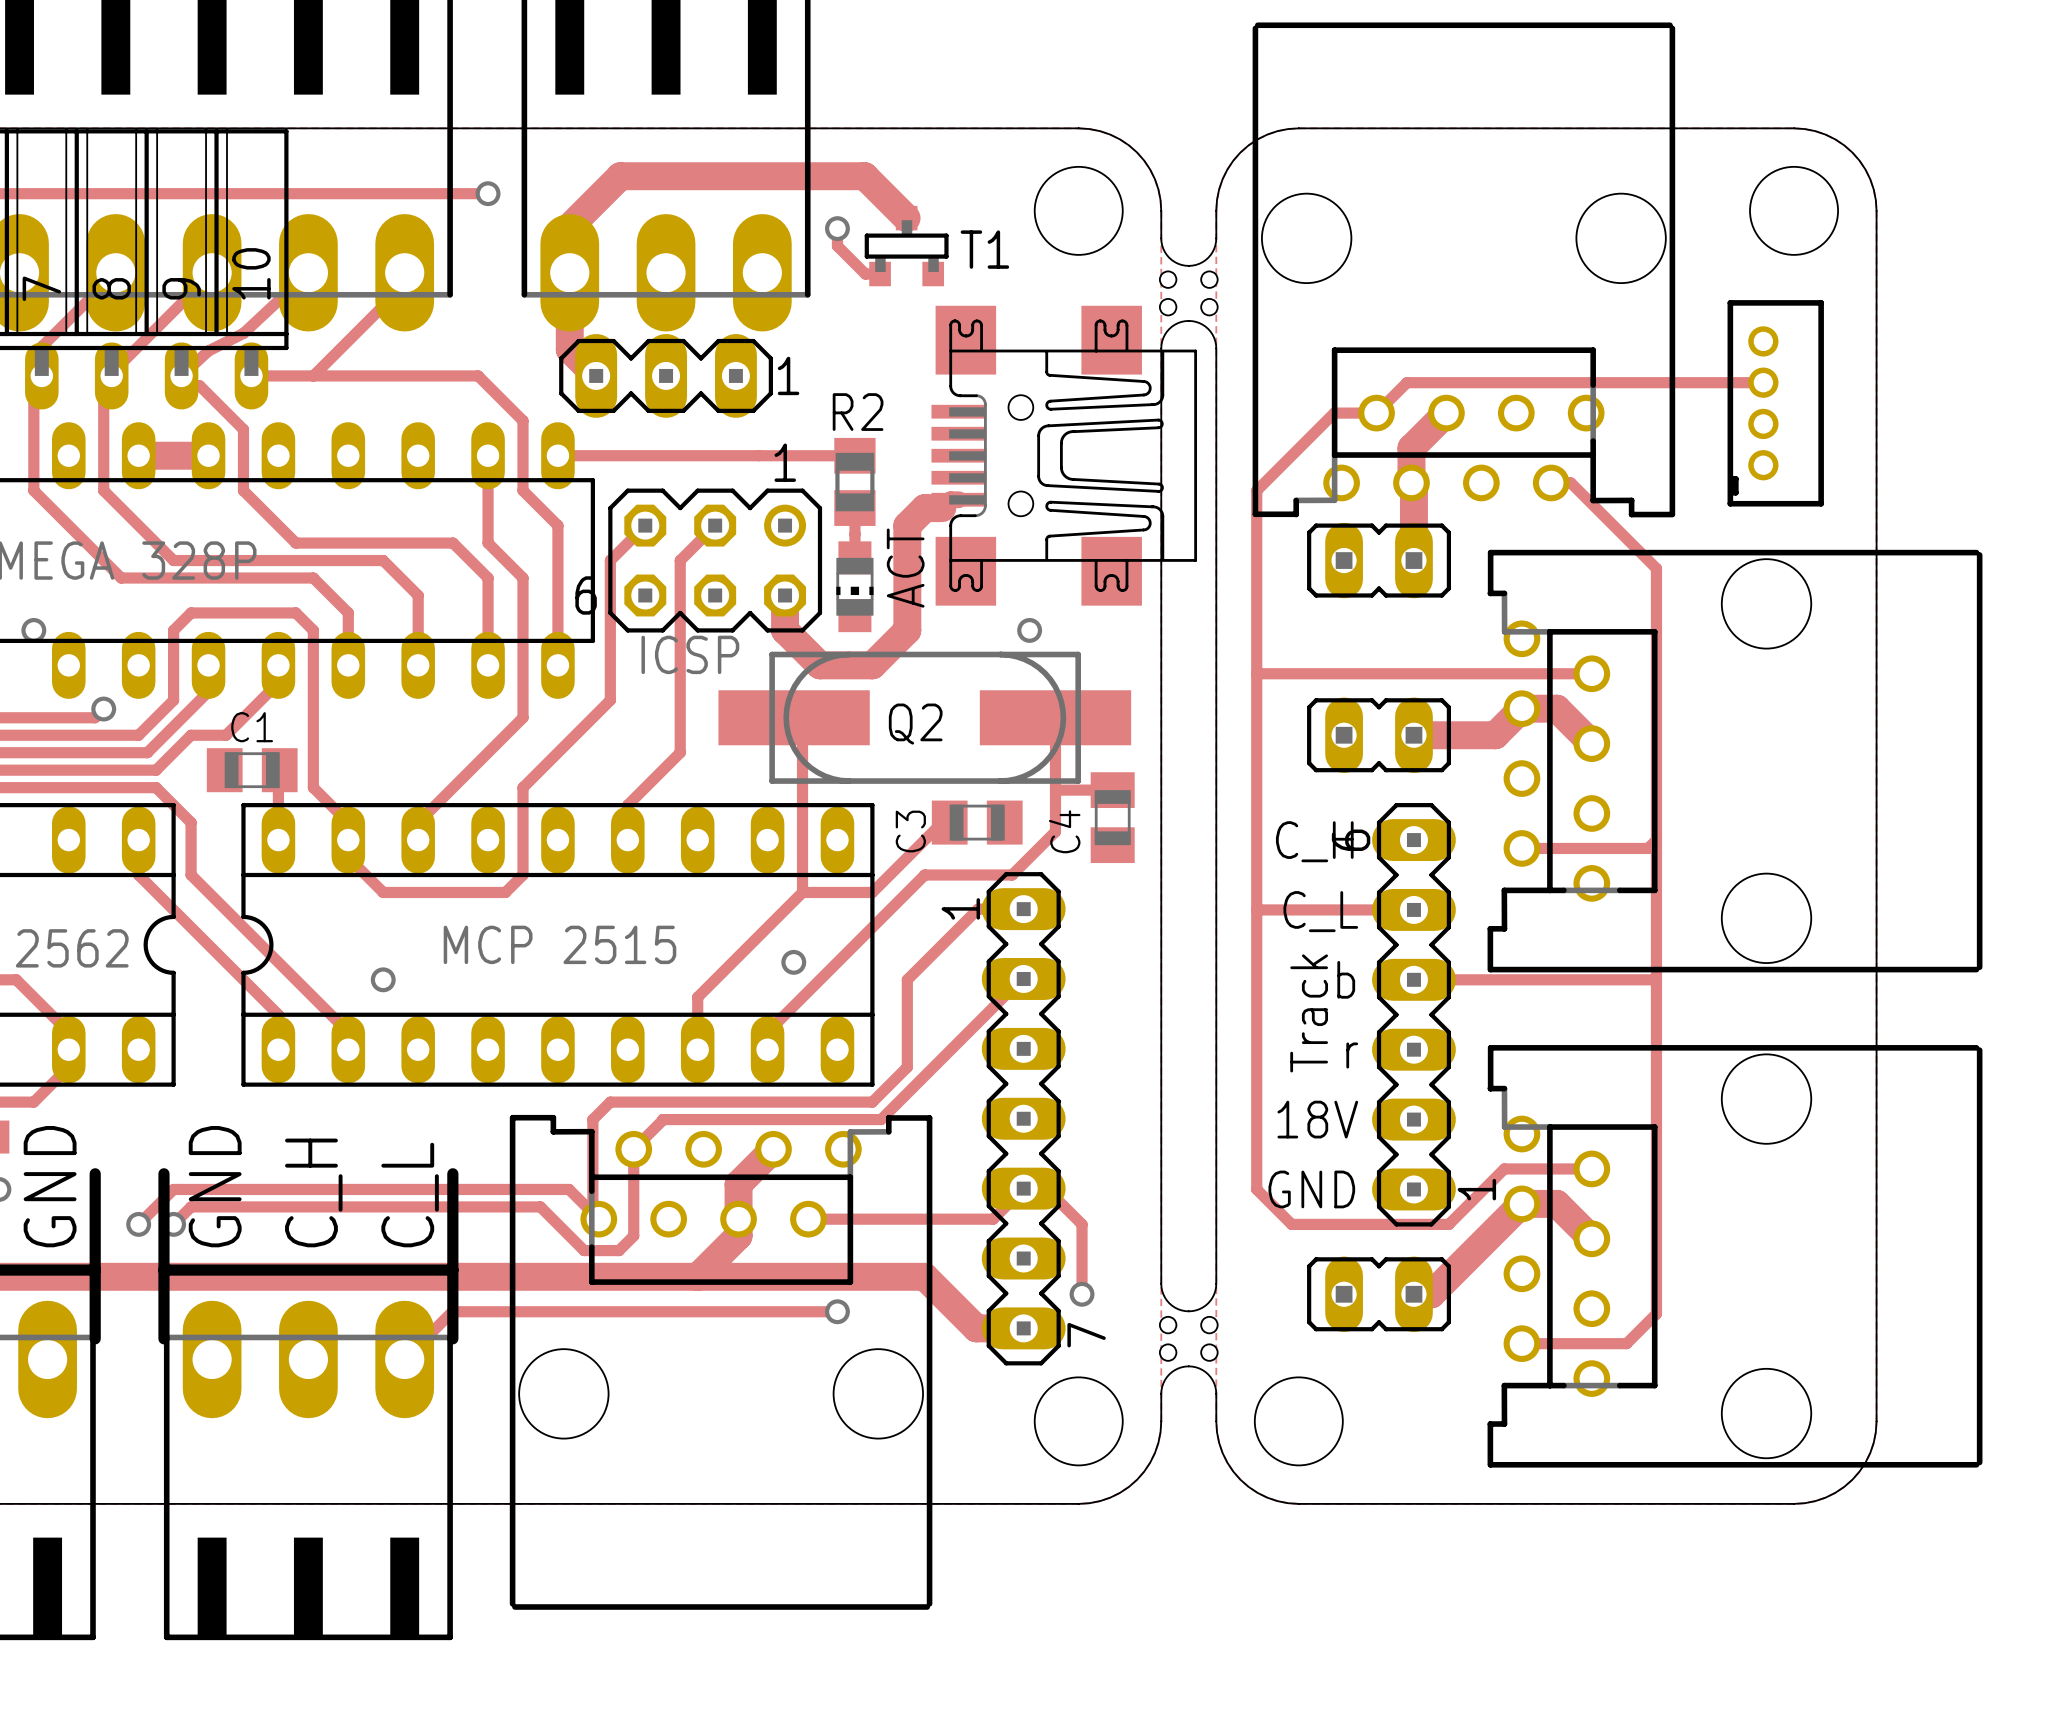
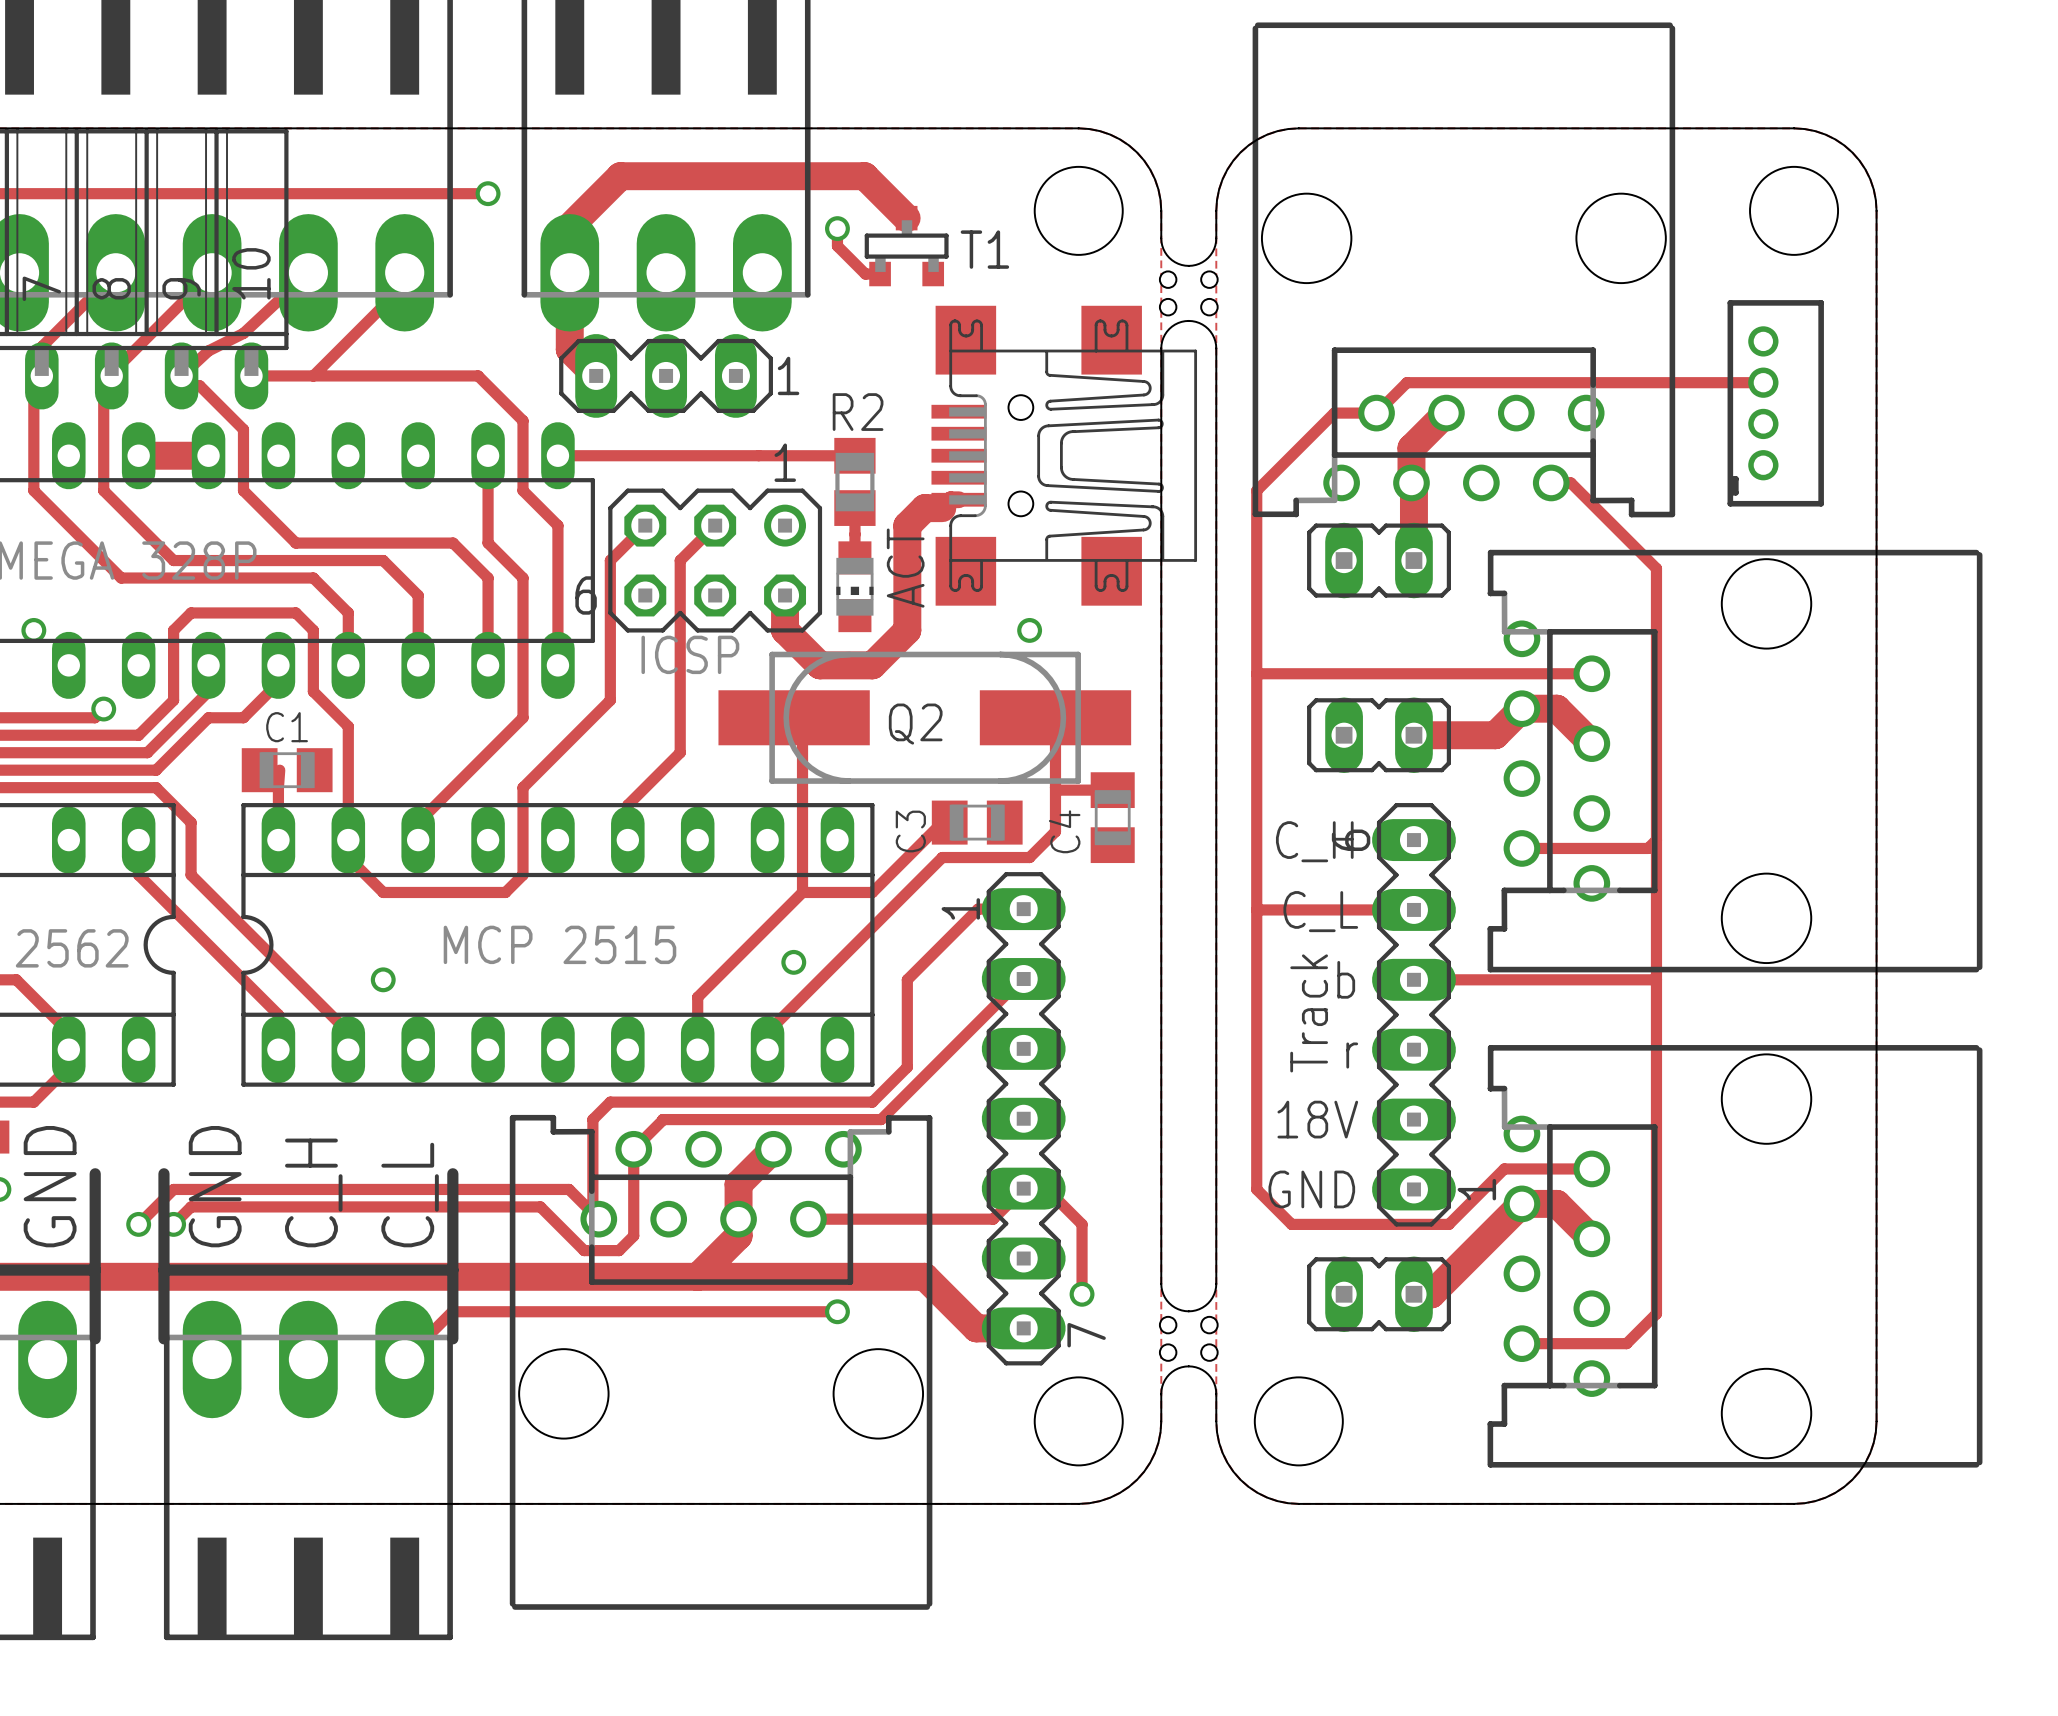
track: (313, 691) (313, 787) (348, 822) -> (313, 691) (348, 726) (348, 822)
track: (243, 717) (226, 735) (191, 735) -> (243, 717) (208, 717) (191, 735)
C1 position: (252, 770) -> (287, 770)
track: (1029, 857) (1012, 875) (924, 875) -> (1029, 857) (942, 857) (924, 875)

